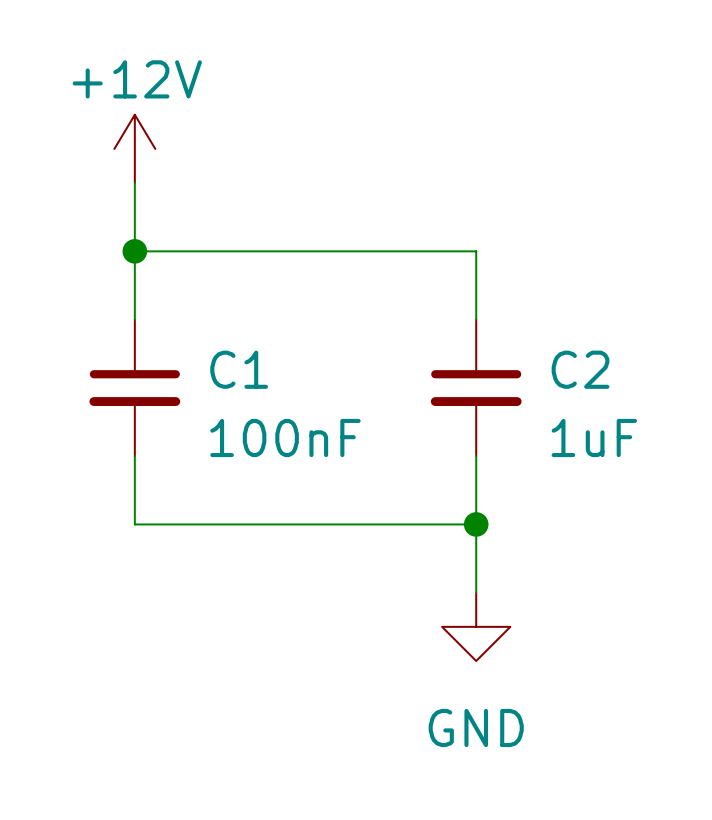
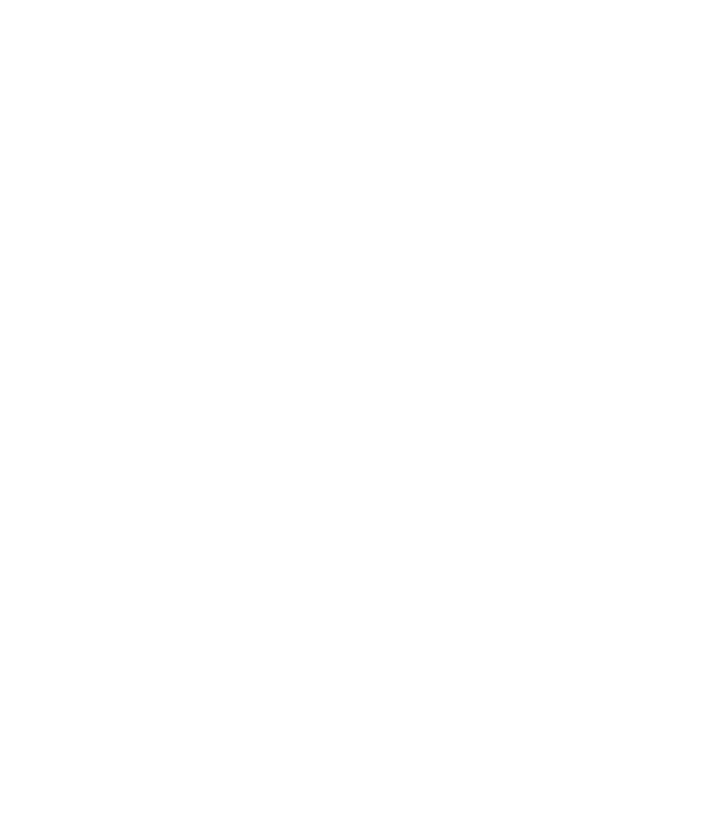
power symbol: +12V (134, 148) -> none
wire: (134, 183) (134, 319) -> none
wire: (134, 251) (476, 251) (476, 319) -> none
junction: (134, 251) -> none
C1: 100nF (134, 387) -> none
C2: 1uF (476, 387) -> none
wire: (134, 456) (134, 524) (476, 524) -> none
wire: (476, 456) (476, 592) -> none
junction: (476, 524) -> none
power symbol: GND (476, 626) -> none

